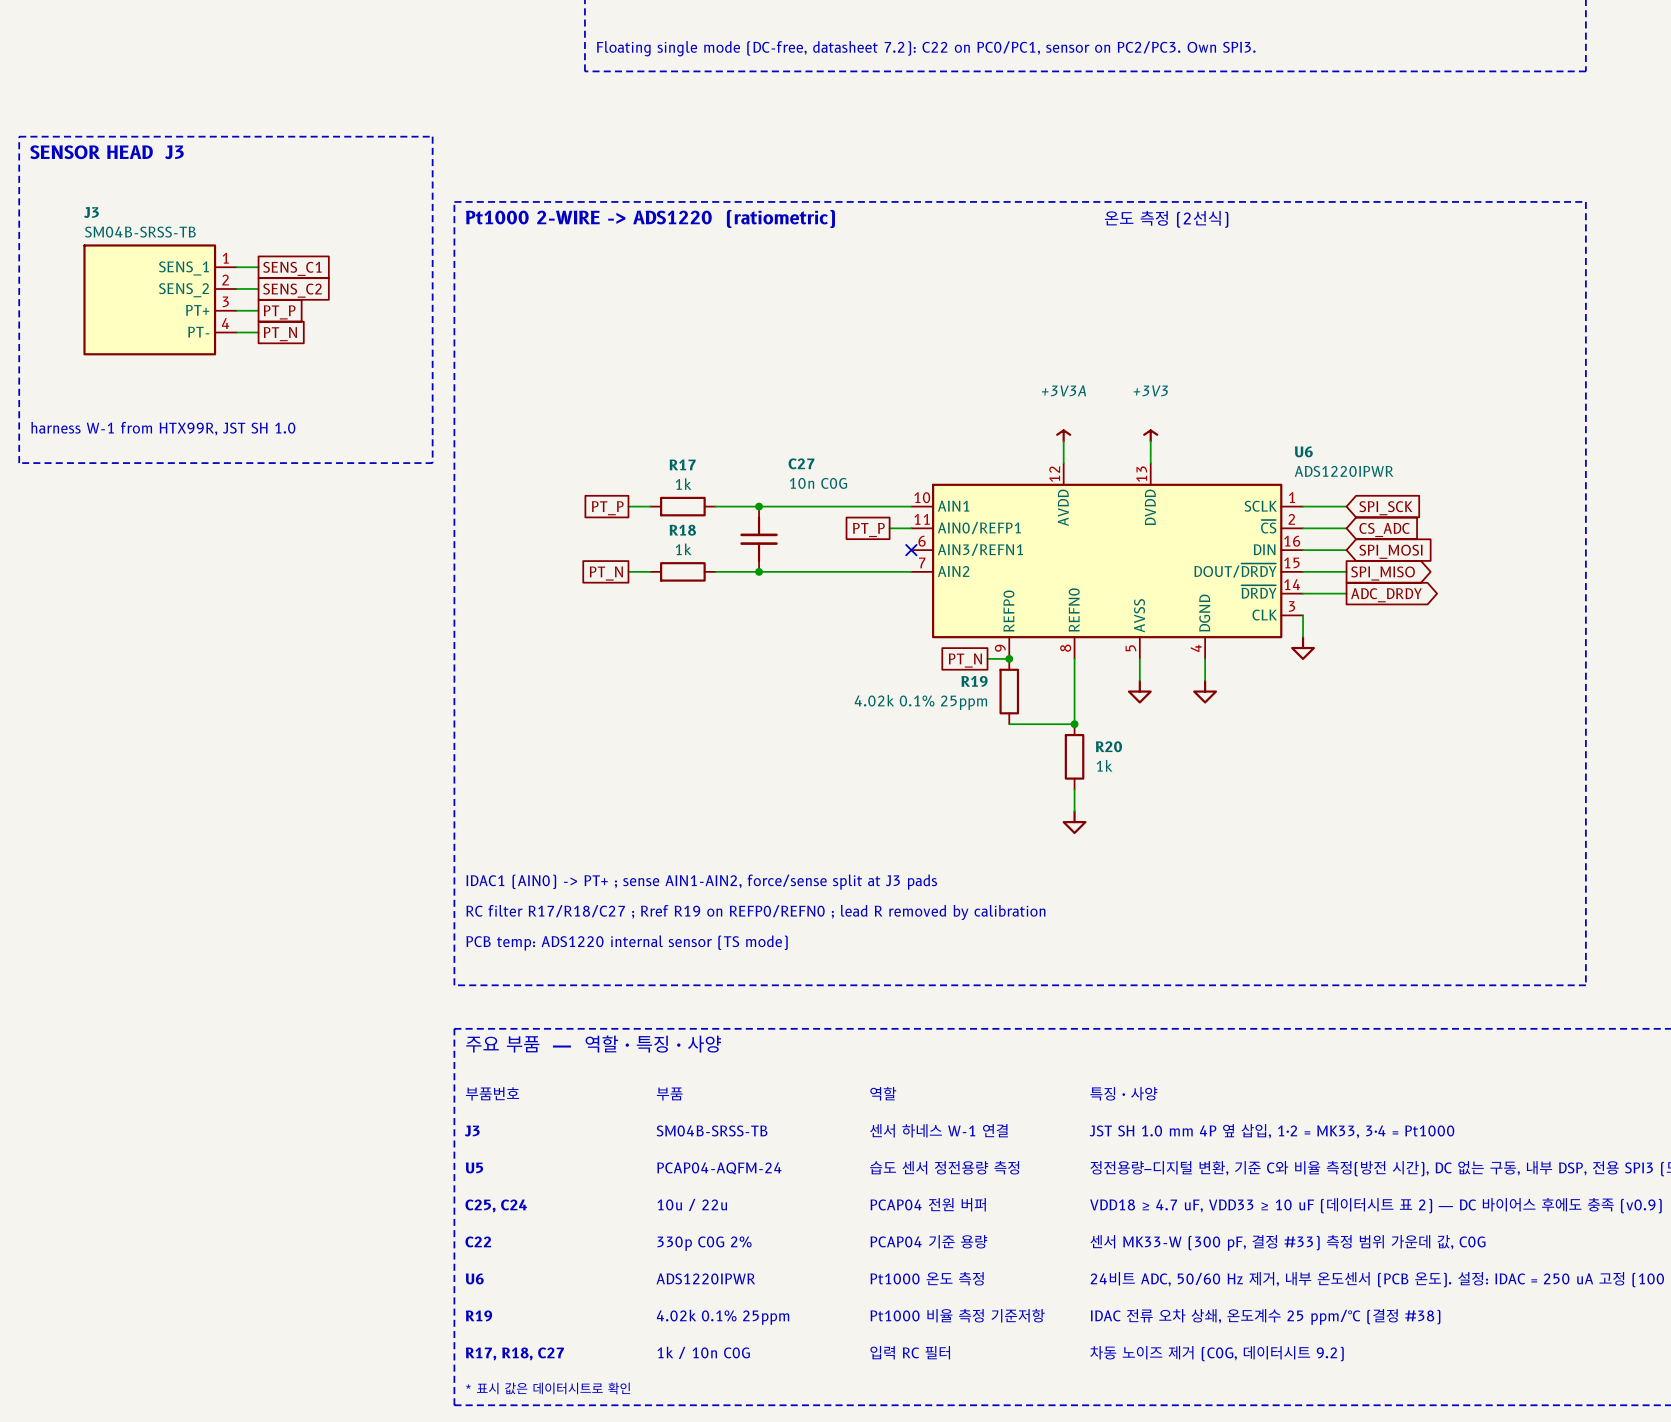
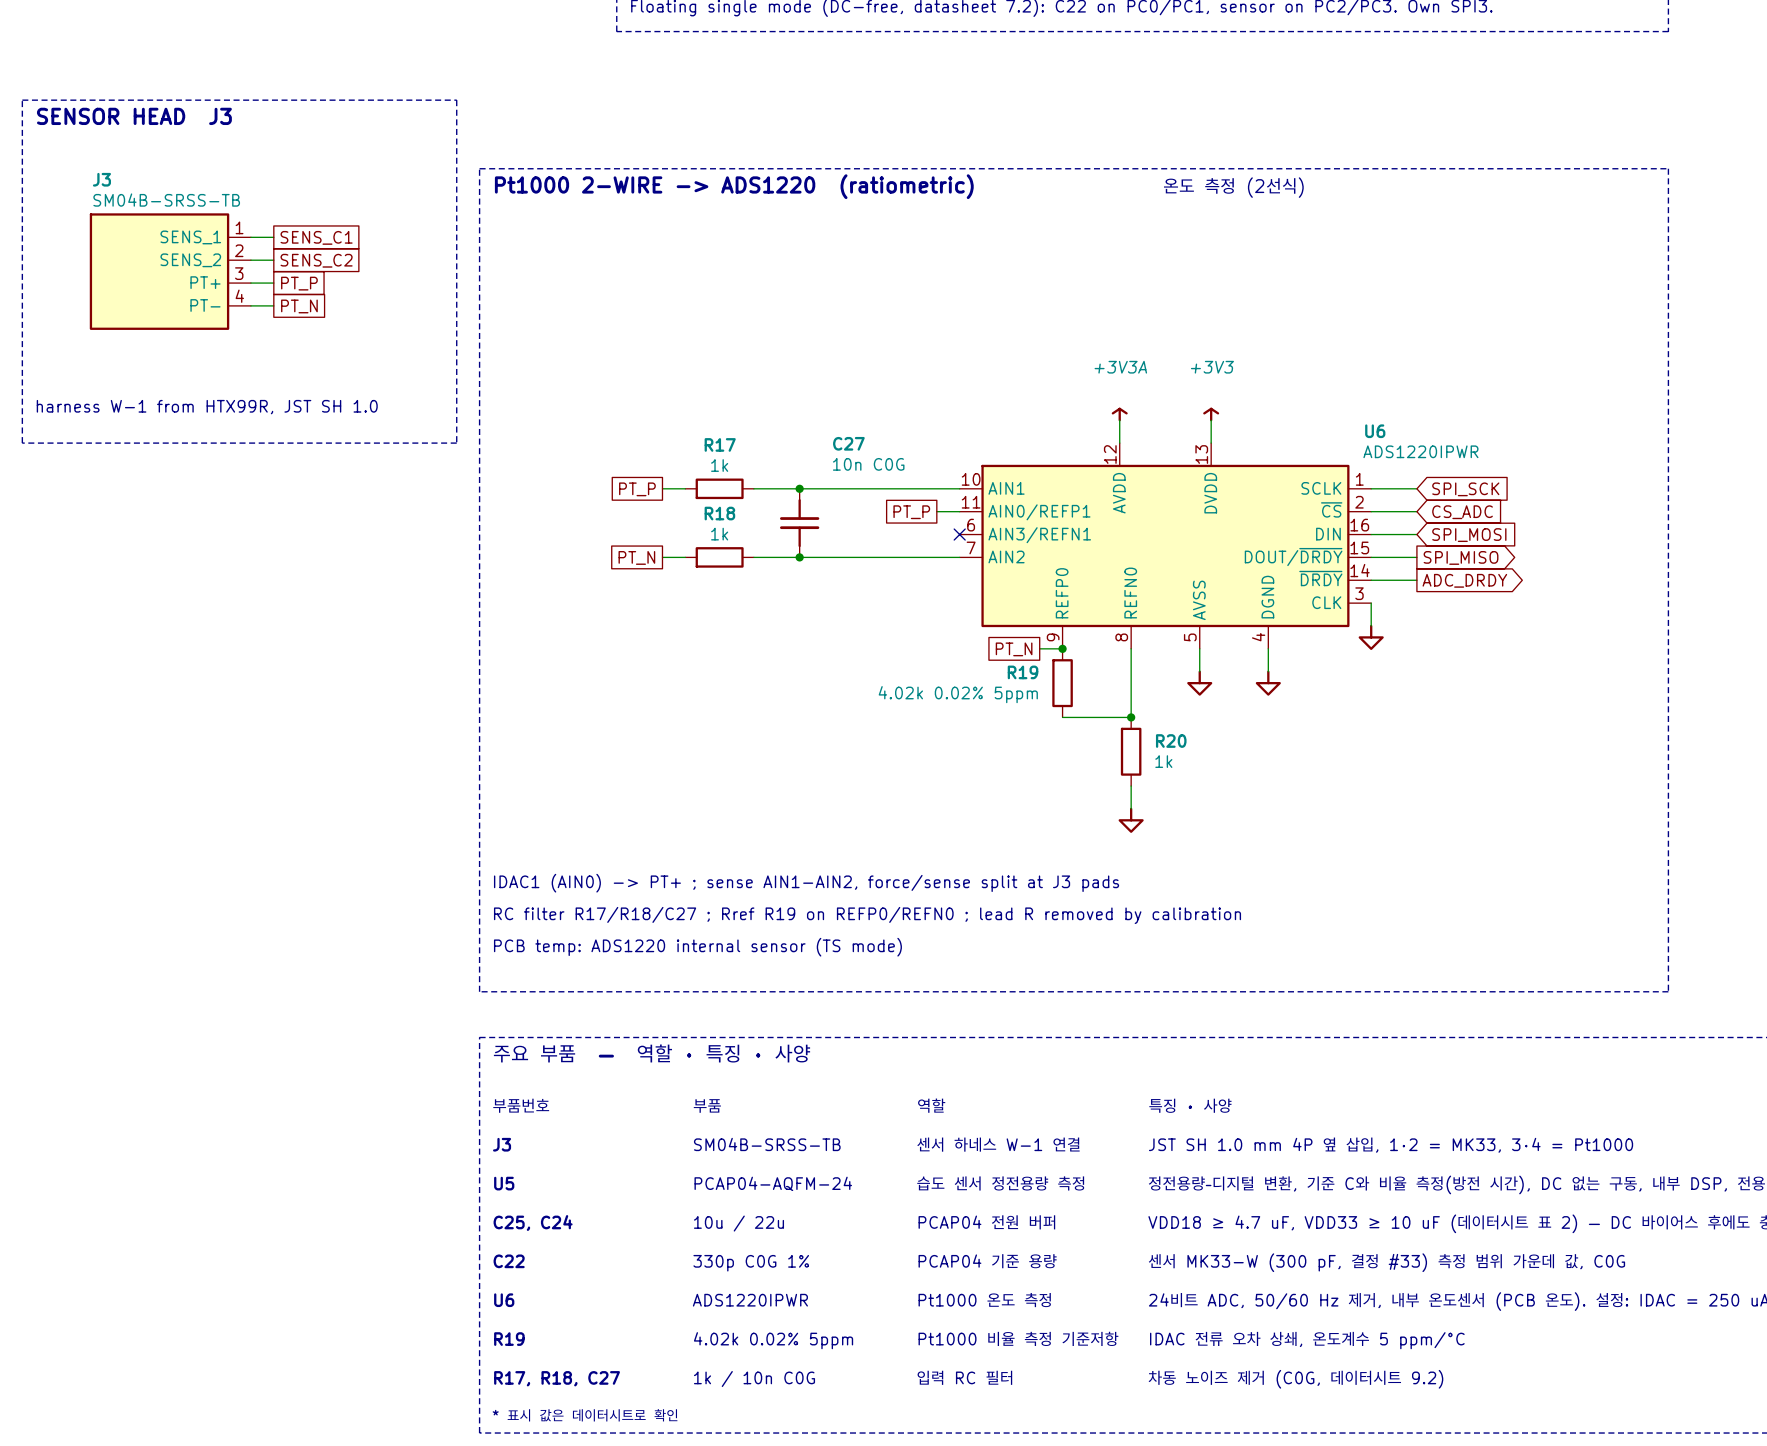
R19 value: 4.02k 0.1% 25ppm (920, 702) -> 4.02k 0.02% 5ppm (958, 694)
text: 330p C0G 2% (704, 1243) -> 330p C0G 1% (751, 1263)
text: IDAC 전류 오차 상쇄, 온도계수 25 ppm/°C (결정 #38) (1265, 1316) -> IDAC 전류 오차 상쇄, 온도계수 5 ppm/°C (1307, 1340)
text: 4.02k 0.1% 25ppm (723, 1317) -> 4.02k 0.02% 5ppm (773, 1340)

